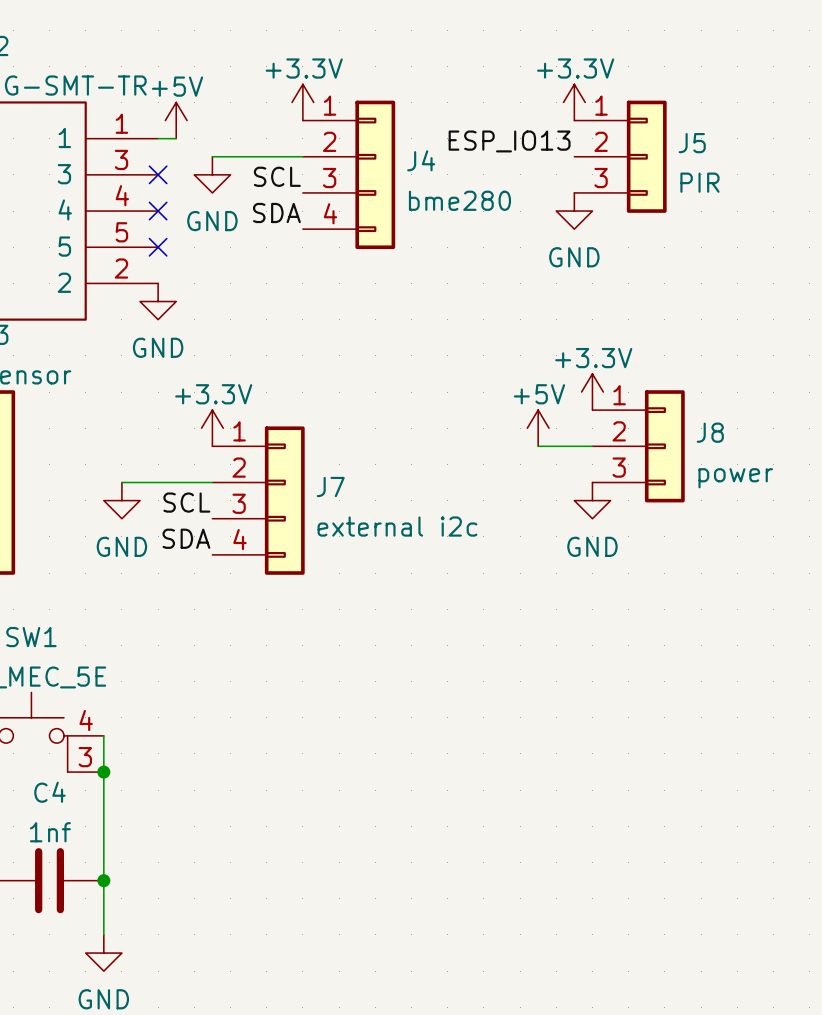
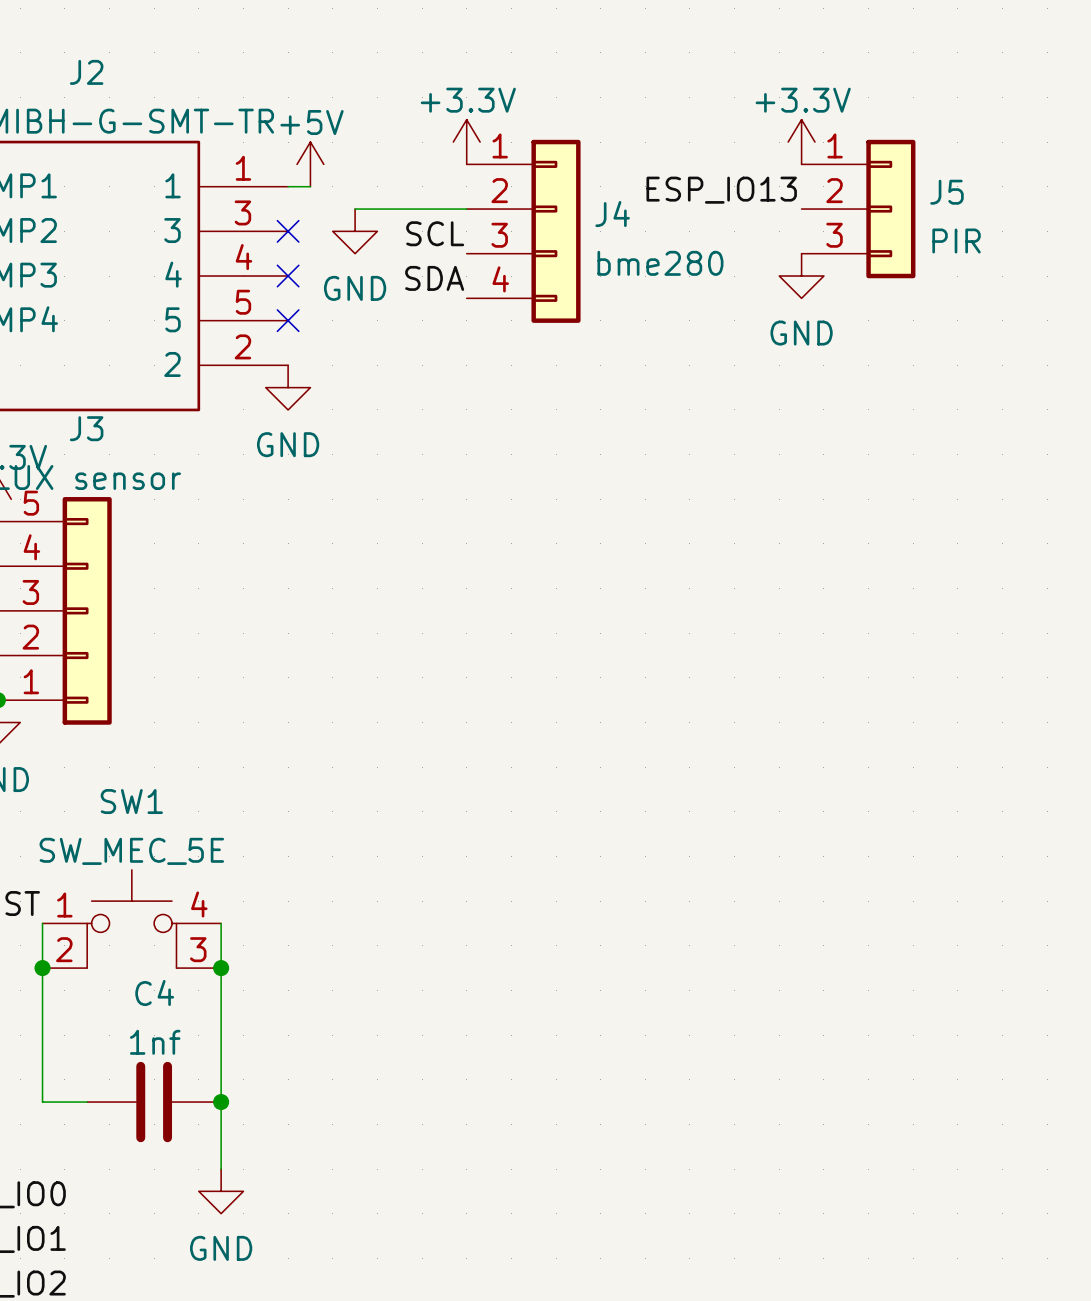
power symbol: +3.3V (592, 392) -> none
power symbol: +3.3V (212, 428) -> none
power symbol: +5V (538, 428) -> none
wire: (538, 446) (592, 446) -> none
J8: power (638, 446) -> none
wire: (121, 482) (212, 482) -> none
power symbol: GND (121, 500) -> none
J7: external i2c (258, 500) -> none
power symbol: GND (592, 500) -> none
label: SCL (186, 502) -> none
label: SDA (186, 538) -> none

